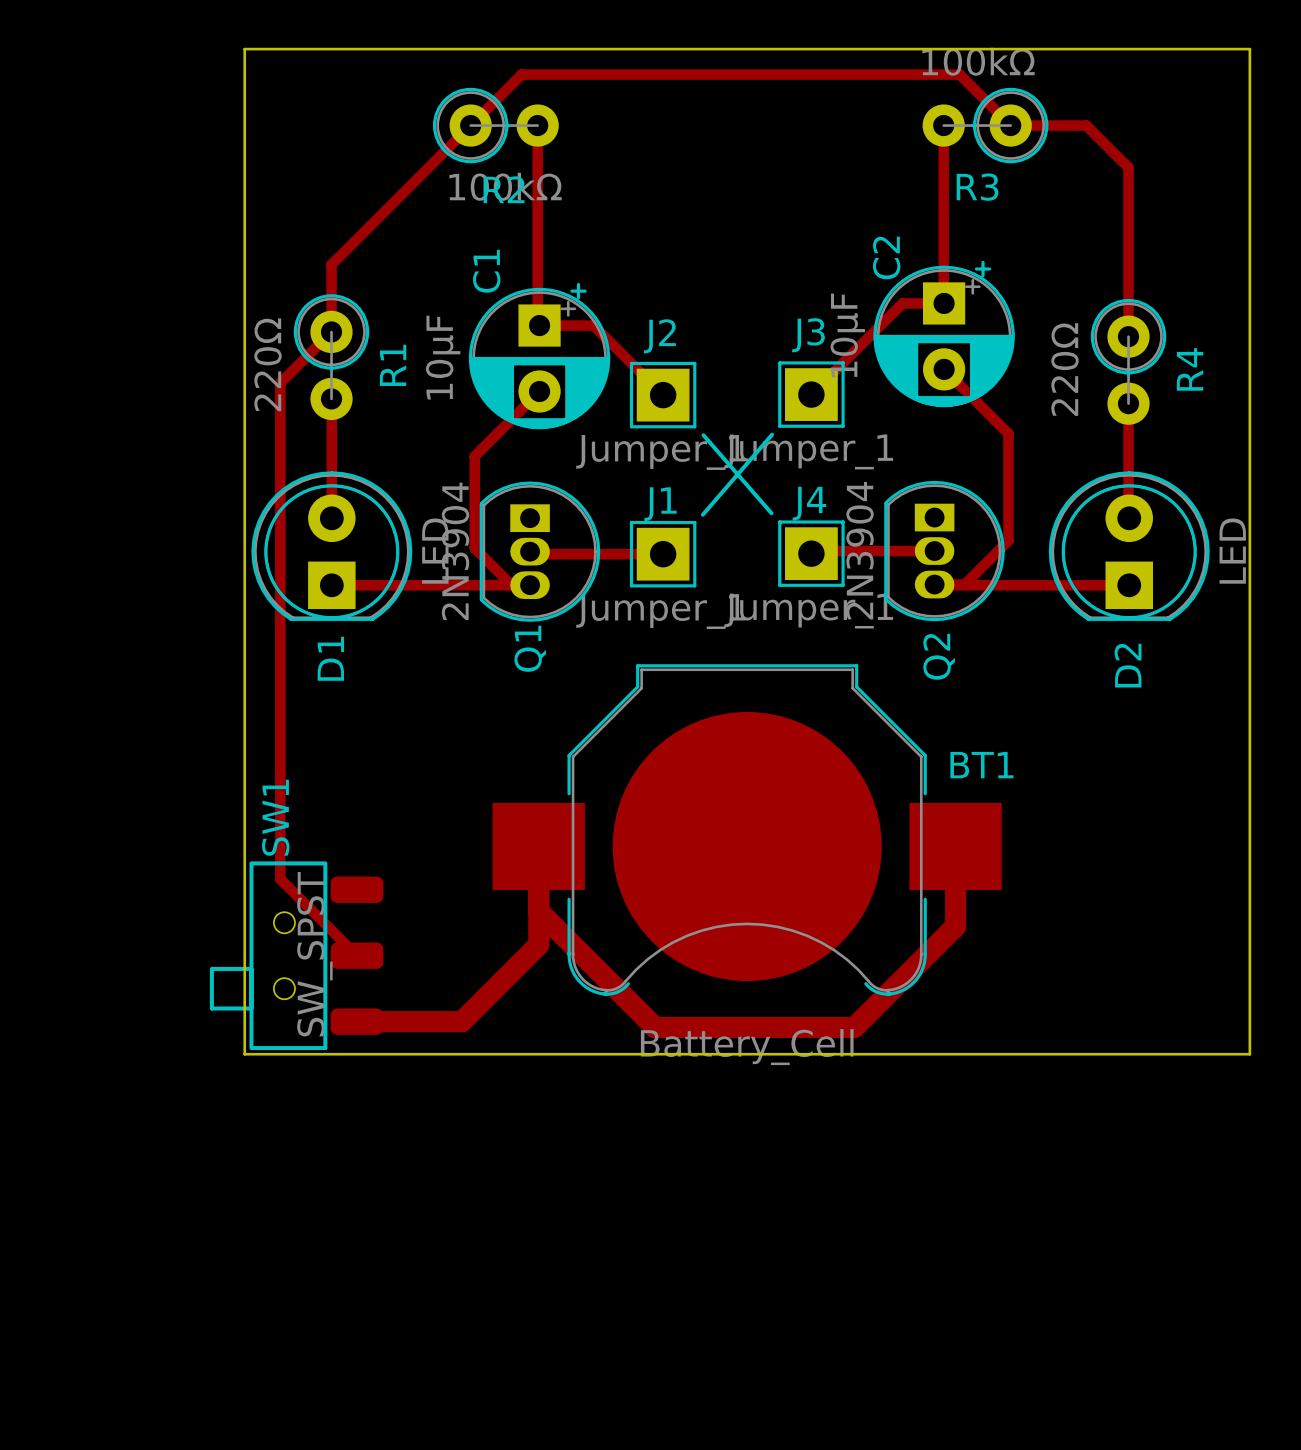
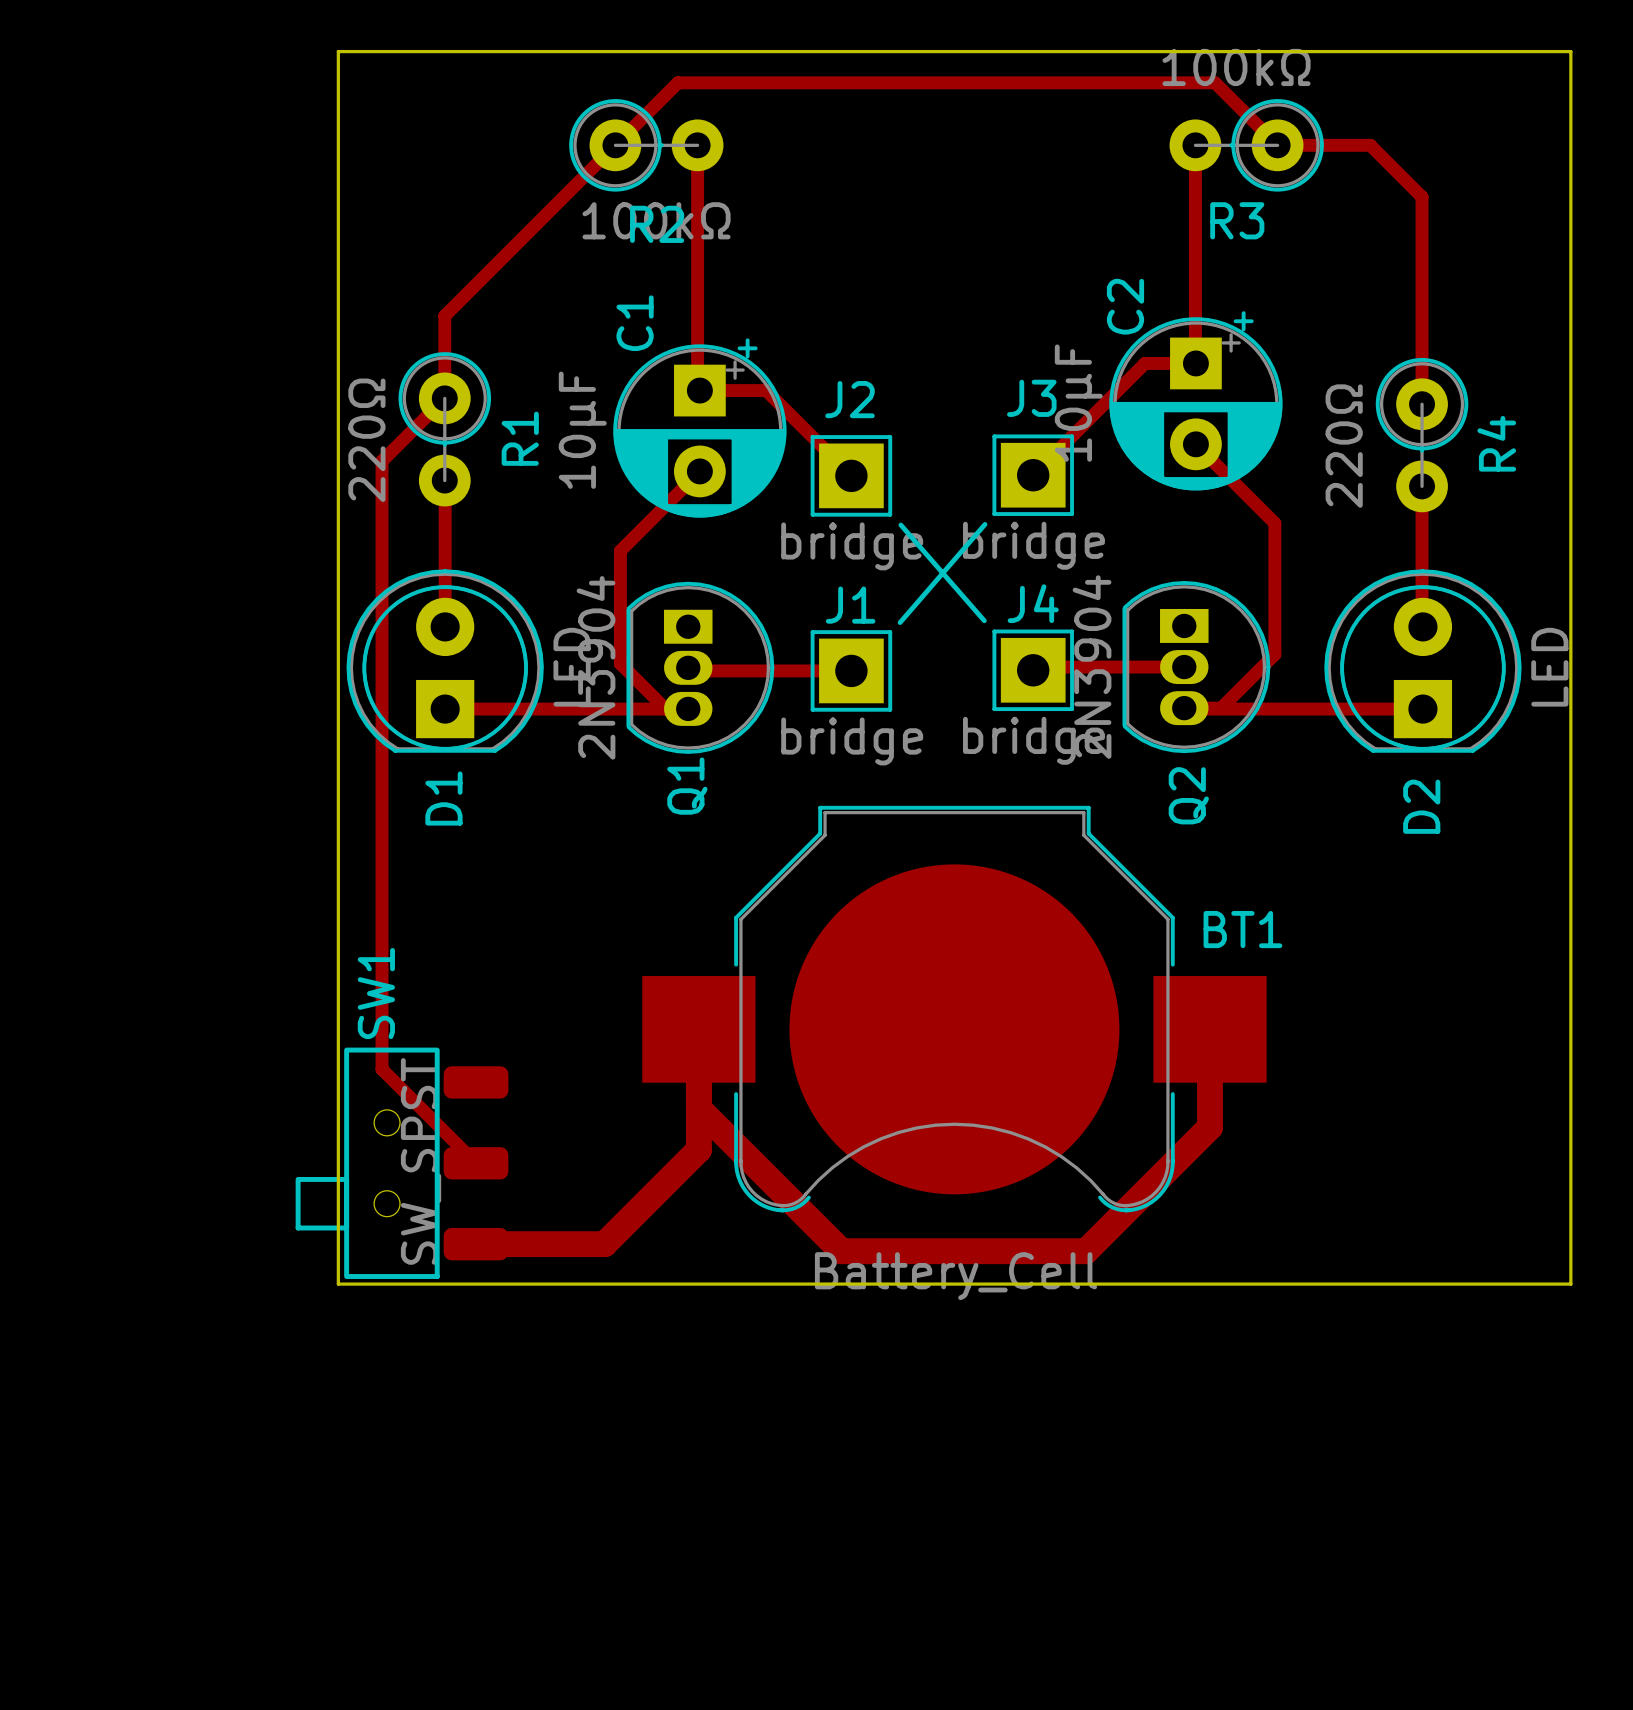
J3 value: Jumper_1 (808, 451) -> bridge (1033, 545)
J2 value: Jumper_1 (660, 452) -> bridge (852, 546)
J1 value: Jumper_1 (660, 611) -> bridge (852, 741)
J4 value: Jumper_1 (808, 611) -> bridge (1033, 740)

